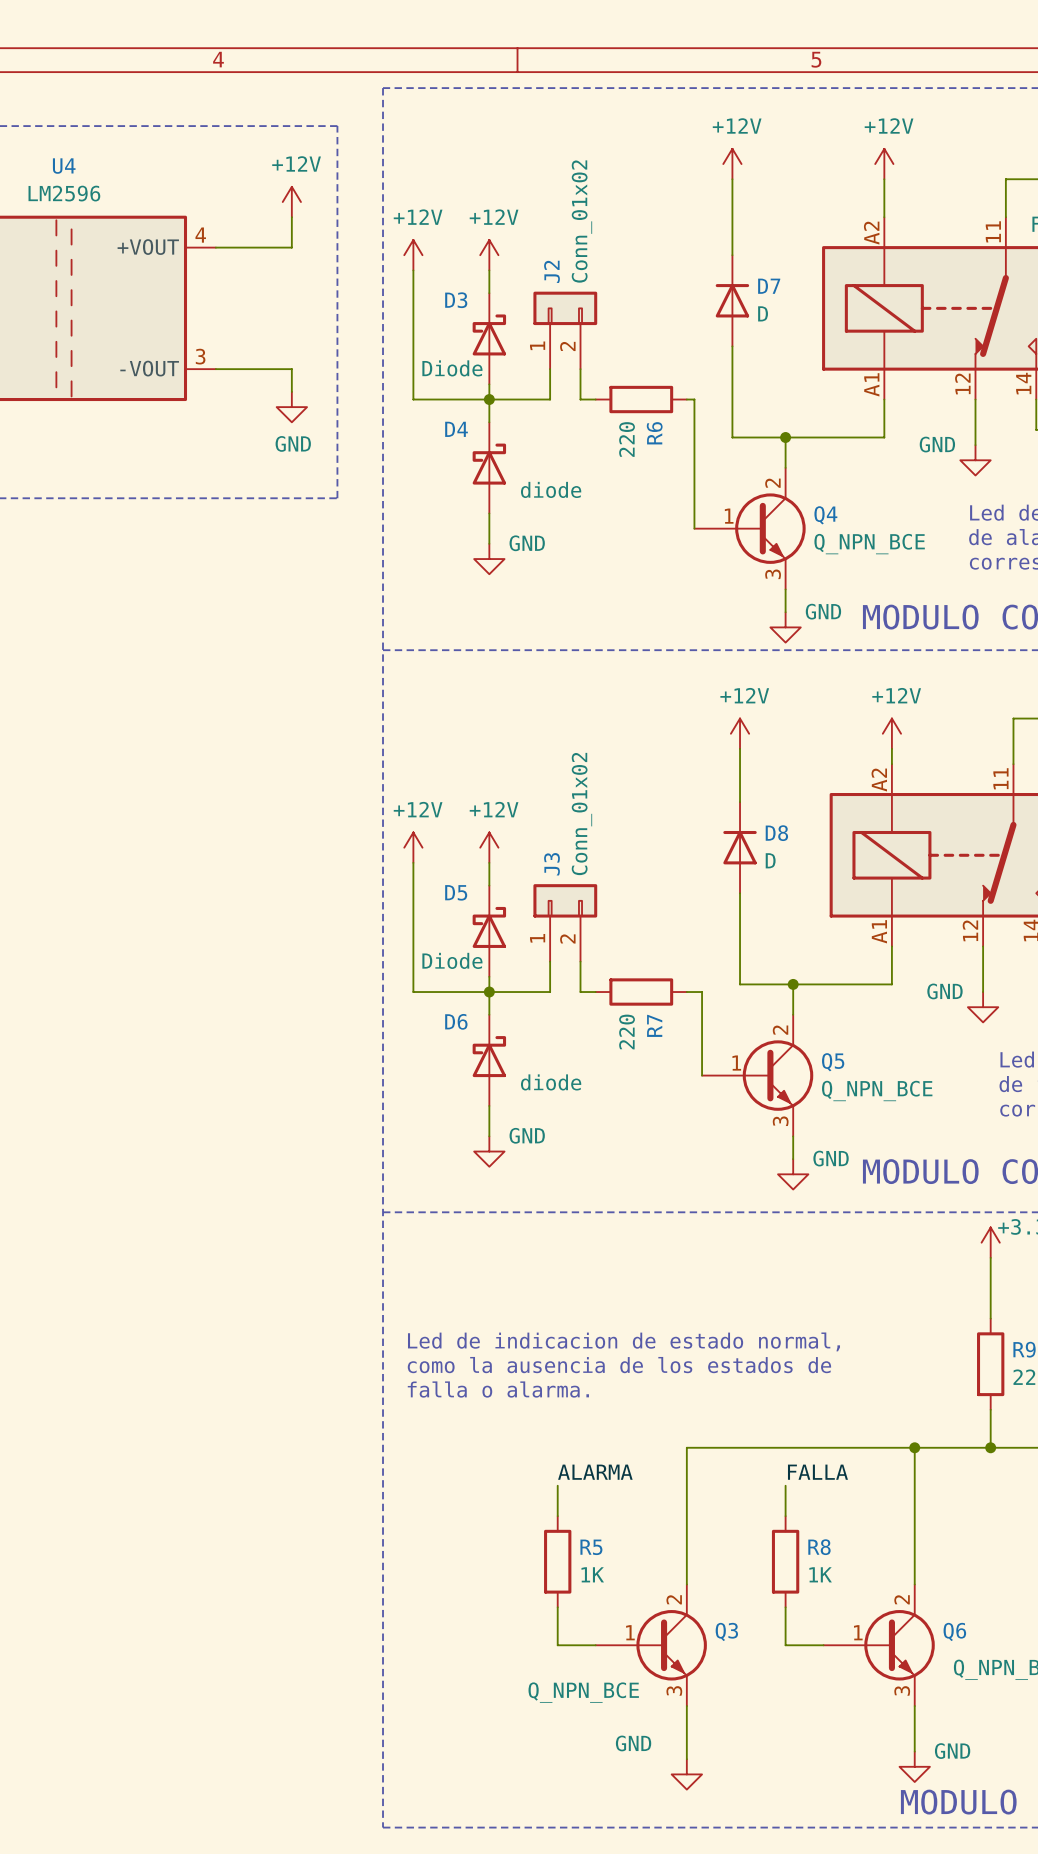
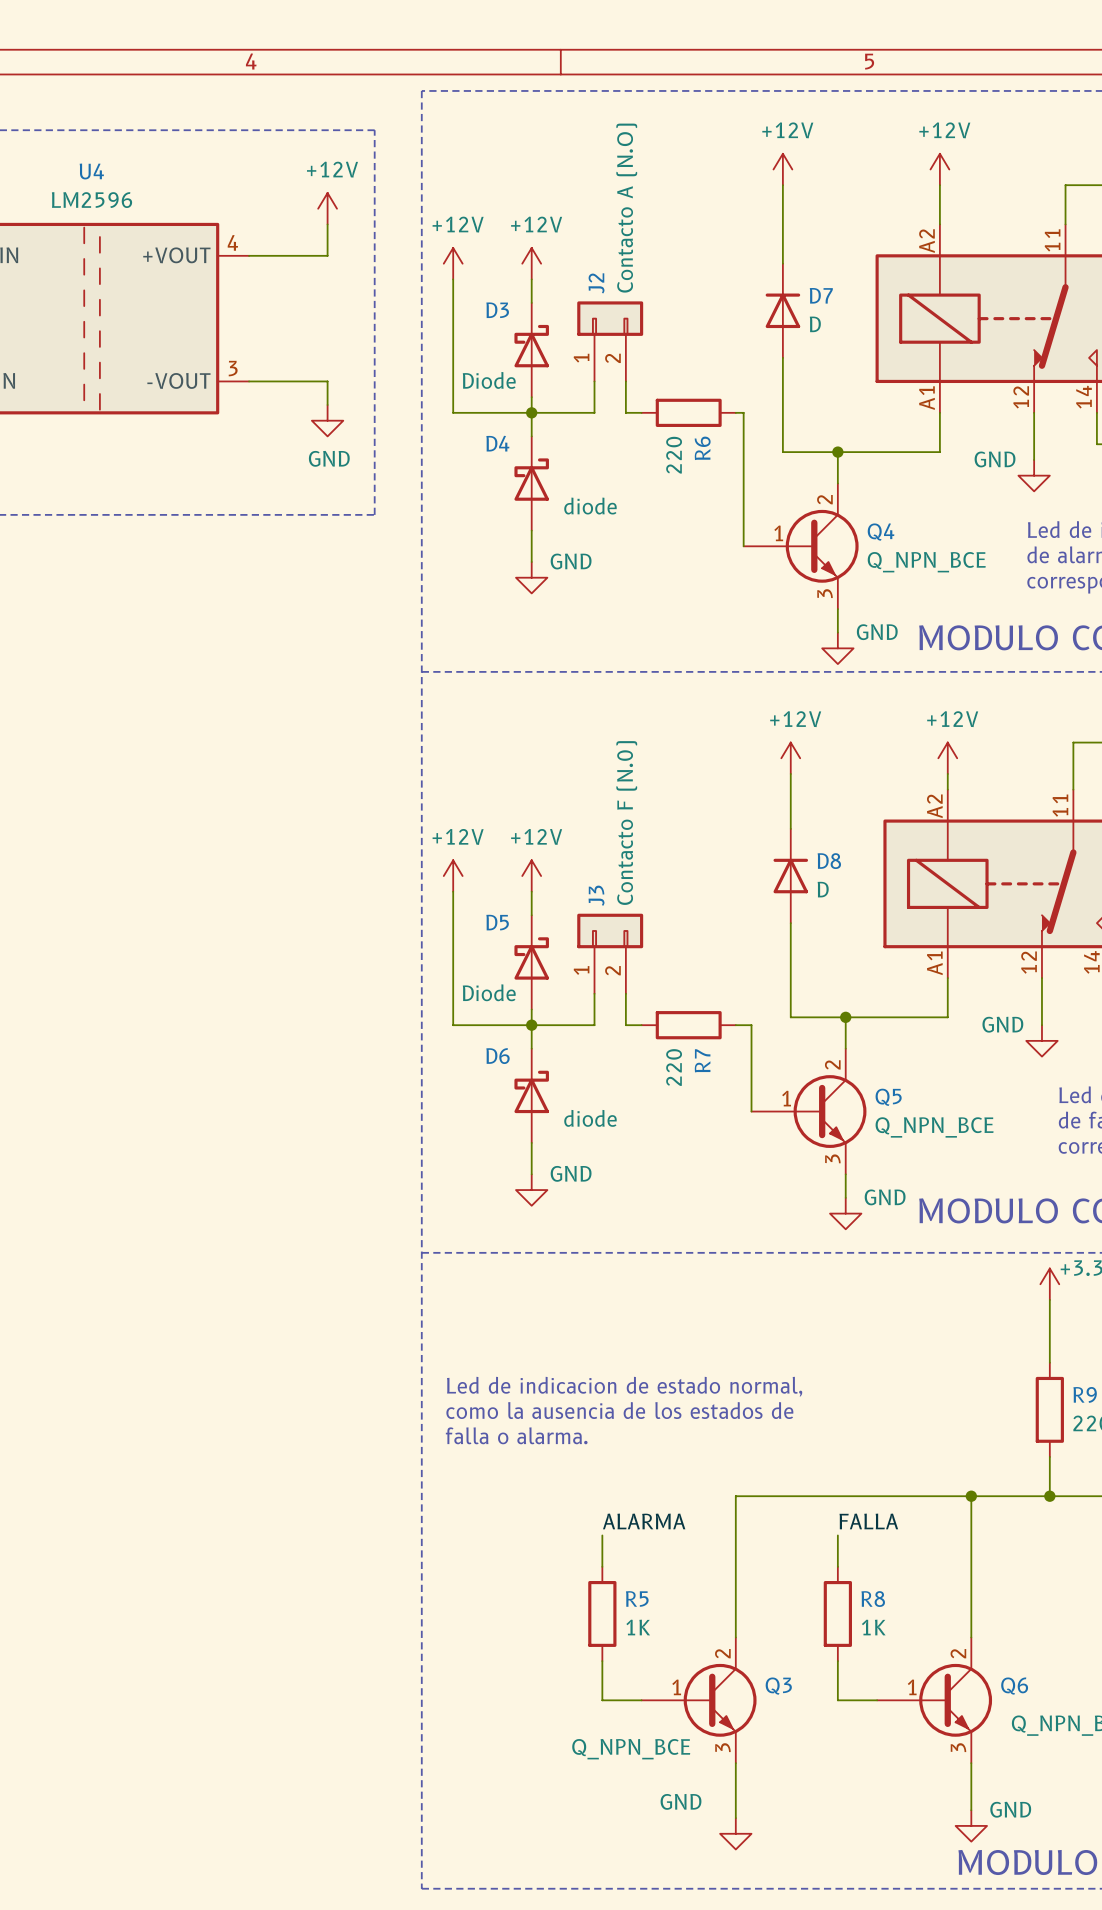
J2 value: Conn_01x02 (581, 221) -> Contacto A (N.O) (626, 208)
J3 value: Conn_01x02 (581, 814) -> Contacto F (N.0) (626, 823)

